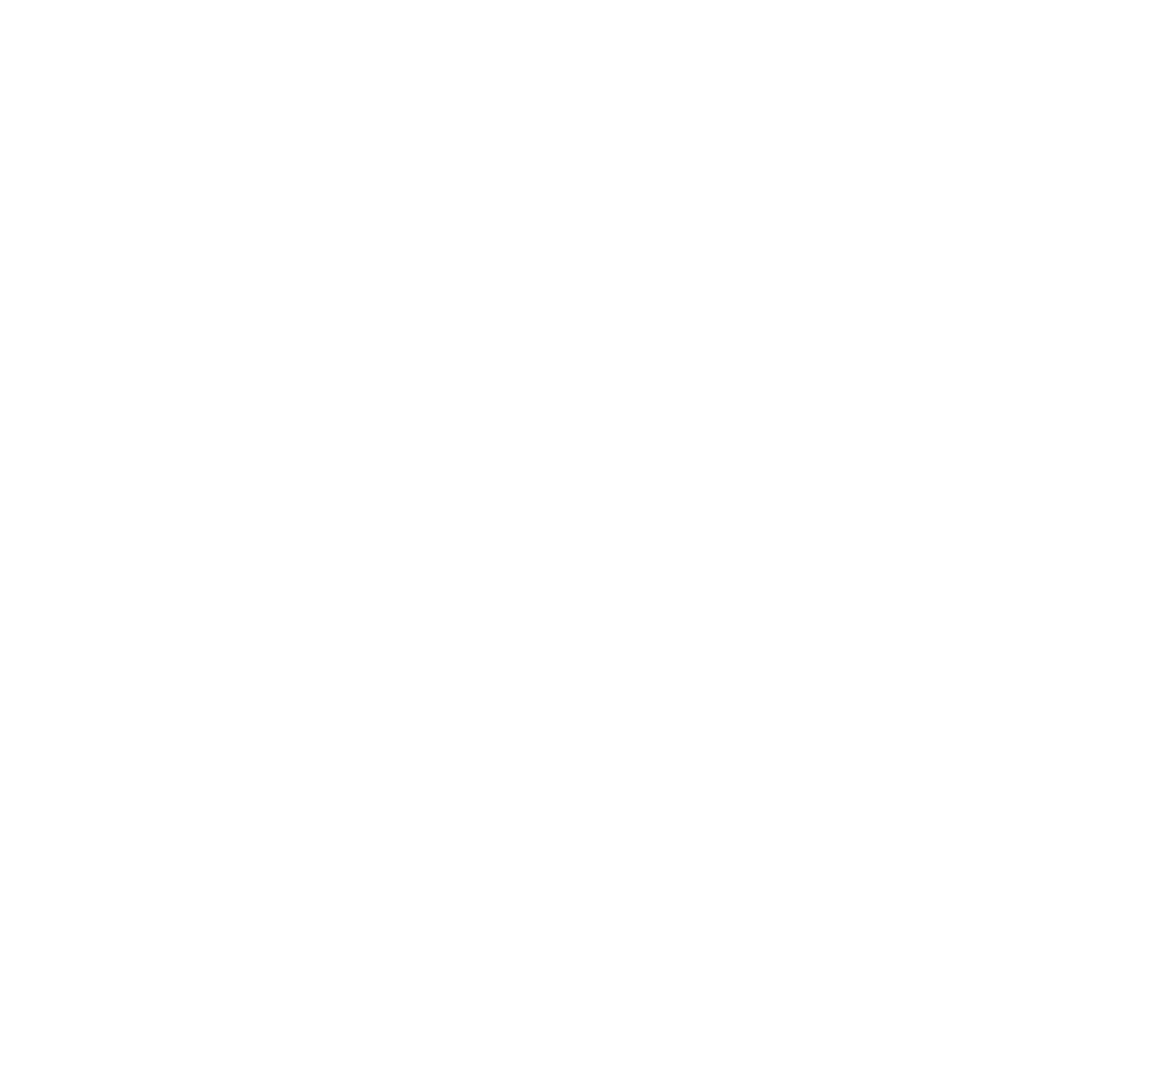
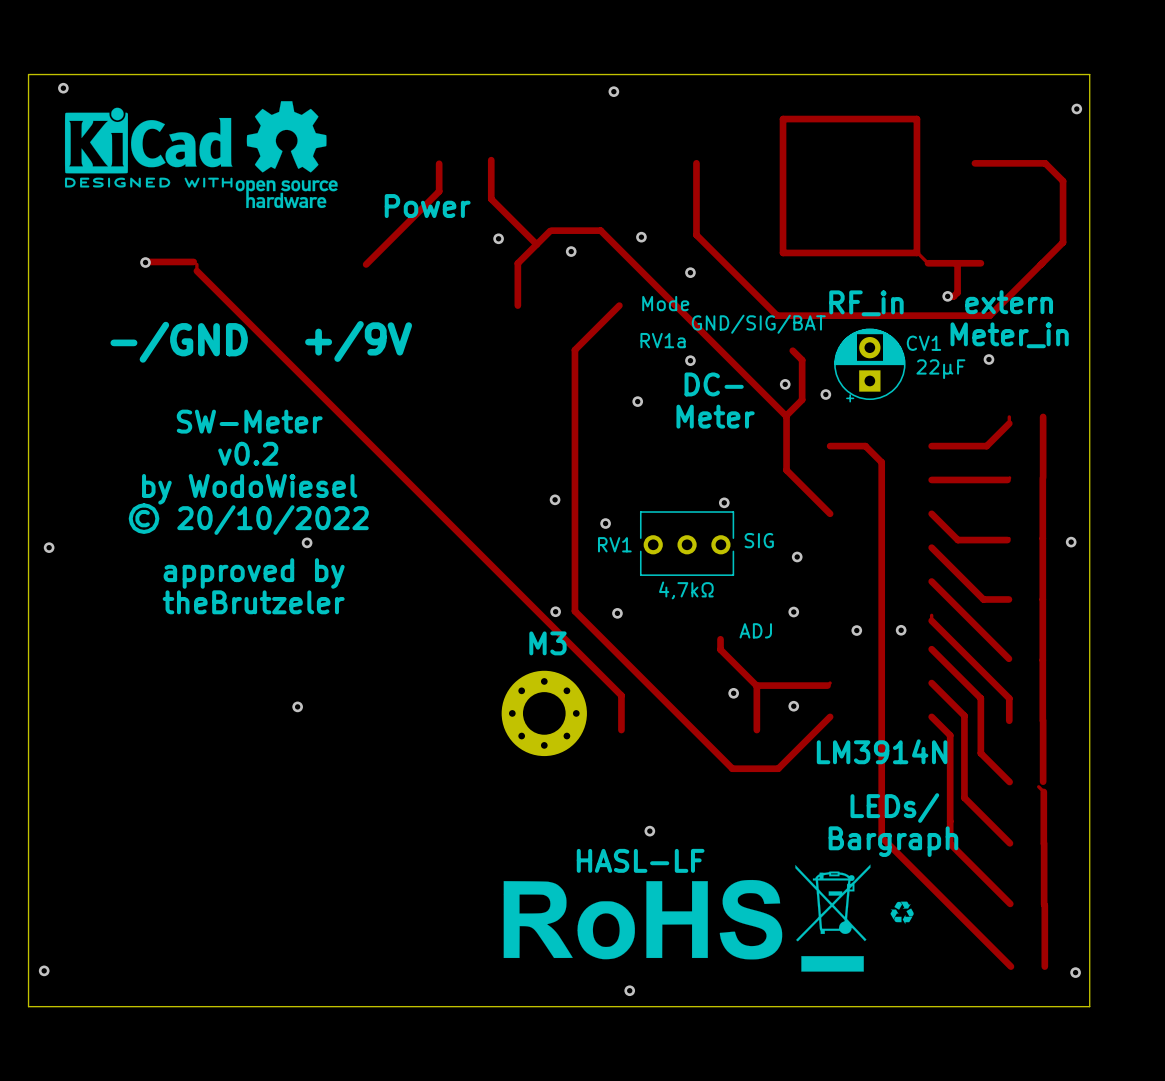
board edge: none -> (28, 74) (1089, 74) (1089, 1006) (28, 1006) (28, 74)
via: none -> (63, 88)
via: none -> (613, 91)
drawing: none -> [64, 101, 338, 209]
via: none -> (1076, 108)
track: none -> (783, 119) (916, 119) (916, 252) (783, 252) (783, 119)
track: none -> (491, 160) (491, 199) (536, 244)
track: none -> (697, 162) (696, 235) (777, 315) (989, 315) (1063, 242) (1063, 181) (1045, 163) (974, 163)
track: none -> (439, 163) (439, 191) (366, 264)
text: none -> Power (427, 206)
track: none -> (551, 230) (600, 230) (785, 415)
track: none -> (550, 231) (517, 263) (517, 305)
via: none -> (641, 237)
via: none -> (498, 238)
via: none -> (571, 251)
track: none -> (917, 251) (928, 263) (980, 263)
track: none -> (193, 261) (145, 262)
via: none -> (145, 262)
track: none -> (955, 263) (957, 265) (957, 292) (953, 296) (947, 296)
track: none -> (196, 264) (196, 271) (621, 695) (621, 730)
via: none -> (690, 272)
via: none -> (947, 296)
text: none -> RF_in (866, 303)
text: none -> Mode (665, 303)
text: none -> extern (1009, 302)
track: none -> (619, 305) (574, 350) (574, 611) (732, 768) (778, 768) (830, 716)
text: none -> GND/SIG/BAT (758, 324)
text: none -> Meter_in (1009, 335)
text: none -> +/9V (358, 341)
text: none -> -/GND (179, 342)
text: none -> RV1a (663, 340)
track: none -> (792, 350) (802, 360) (802, 399) (786, 415)
via: none -> (988, 359)
via: none -> (690, 360)
CV1: none -> 22µF (869, 365)
text: none -> DC- (714, 384)
via: none -> (785, 384)
via: none -> (825, 394)
via: none -> (637, 401)
track: none -> (786, 415) (786, 470) (830, 513)
text: none -> Meter (715, 416)
track: none -> (1009, 416) (1009, 423) (986, 446) (931, 446)
track: none -> (1043, 416) (1043, 781)
text: none -> SW-Meter (249, 421)
track: none -> (830, 446) (865, 446) (881, 462) (881, 837) (1010, 966)
text: none -> v0.2 (248, 453)
track: none -> (1009, 477) (1007, 479) (931, 479)
text: none -> by WodoWiesel (249, 489)
via: none -> (555, 499)
via: none -> (724, 502)
track: none -> (931, 513) (957, 540) (1008, 538)
text: none -> © 20/10/2022 (248, 519)
via: none -> (605, 523)
text: none -> SIG (759, 540)
via: none -> (307, 542)
via: none -> (1071, 542)
part: none -> (687, 543)
text: none -> RV1 (614, 544)
via: none -> (49, 547)
track: none -> (931, 547) (983, 599) (1008, 599)
via: none -> (797, 556)
text: none -> approved by (254, 573)
track: none -> (931, 581) (1008, 660)
text: none -> 4,7kΩ (686, 590)
text: none -> theBrutzeler (253, 602)
via: none -> (555, 611)
via: none -> (793, 612)
via: none -> (617, 613)
track: none -> (931, 615) (931, 620) (1009, 698) (1009, 720)
text: none -> ADJ (755, 630)
via: none -> (856, 630)
via: none -> (901, 630)
track: none -> (720, 639) (720, 649) (756, 685) (756, 730) (756, 685) (827, 685) (830, 683)
text: none -> M3 (547, 643)
track: none -> (931, 649) (980, 698) (980, 753) (1009, 782)
track: none -> (931, 683) (964, 715) (964, 797) (1009, 843)
via: none -> (733, 693)
via: none -> (297, 706)
via: none -> (793, 706)
part: none -> (544, 713)
track: none -> (931, 716) (950, 735) (950, 843) (1010, 904)
text: none -> LM3914N (882, 751)
track: none -> (1038, 786) (1043, 791) (1044, 966)
text: none -> LEDs/ (894, 808)
via: none -> (649, 831)
text: none -> Bargraph (893, 841)
text: none -> HASL-LF (640, 860)
drawing: none -> [503, 864, 871, 972]
drawing: none -> [890, 901, 914, 925]
via: none -> (44, 970)
via: none -> (1075, 972)
via: none -> (629, 990)

